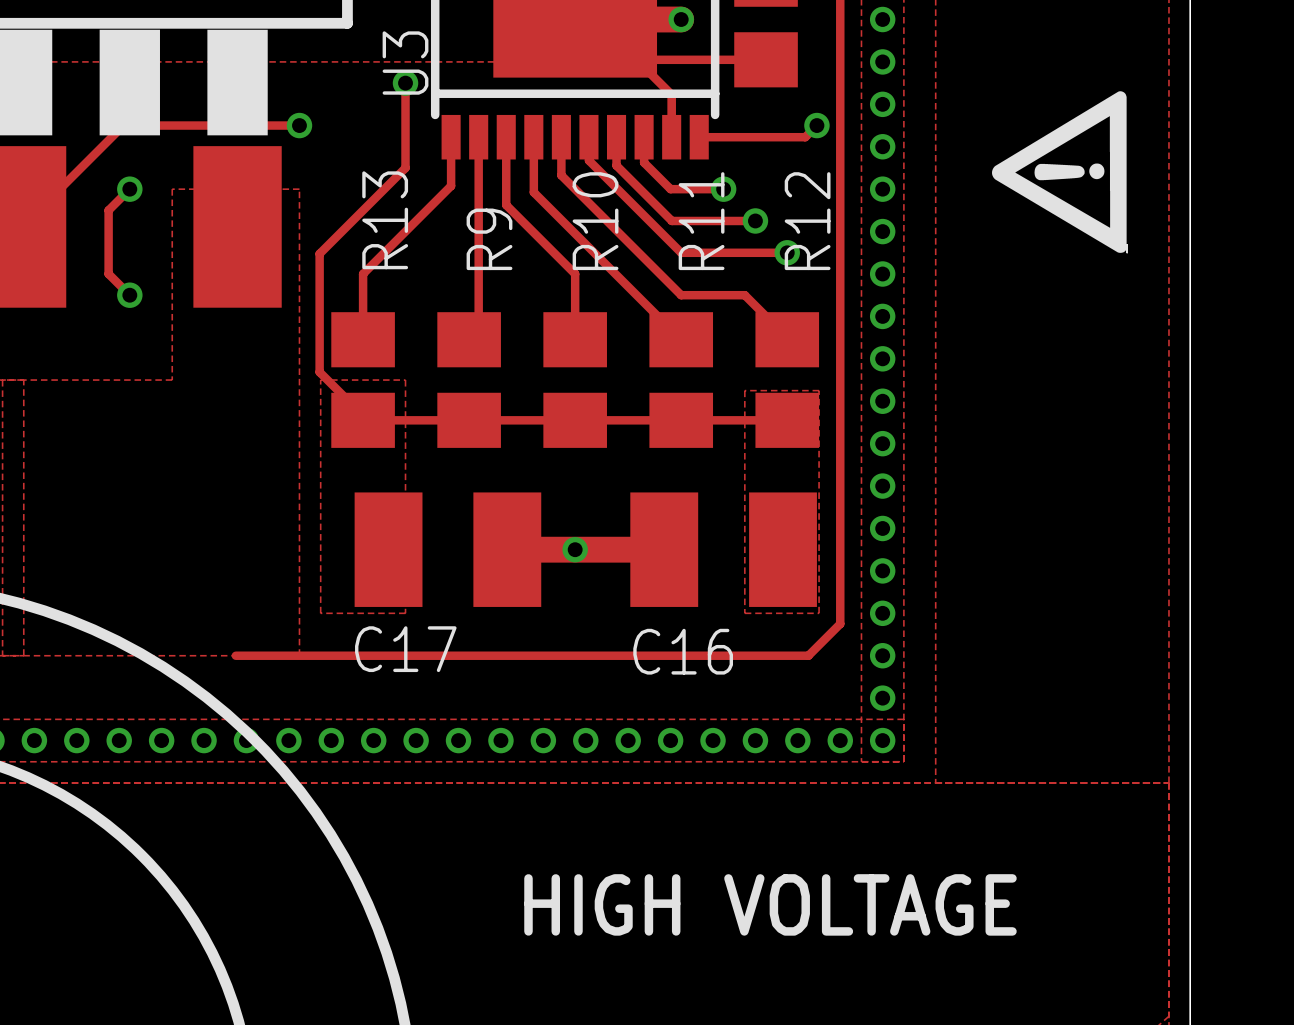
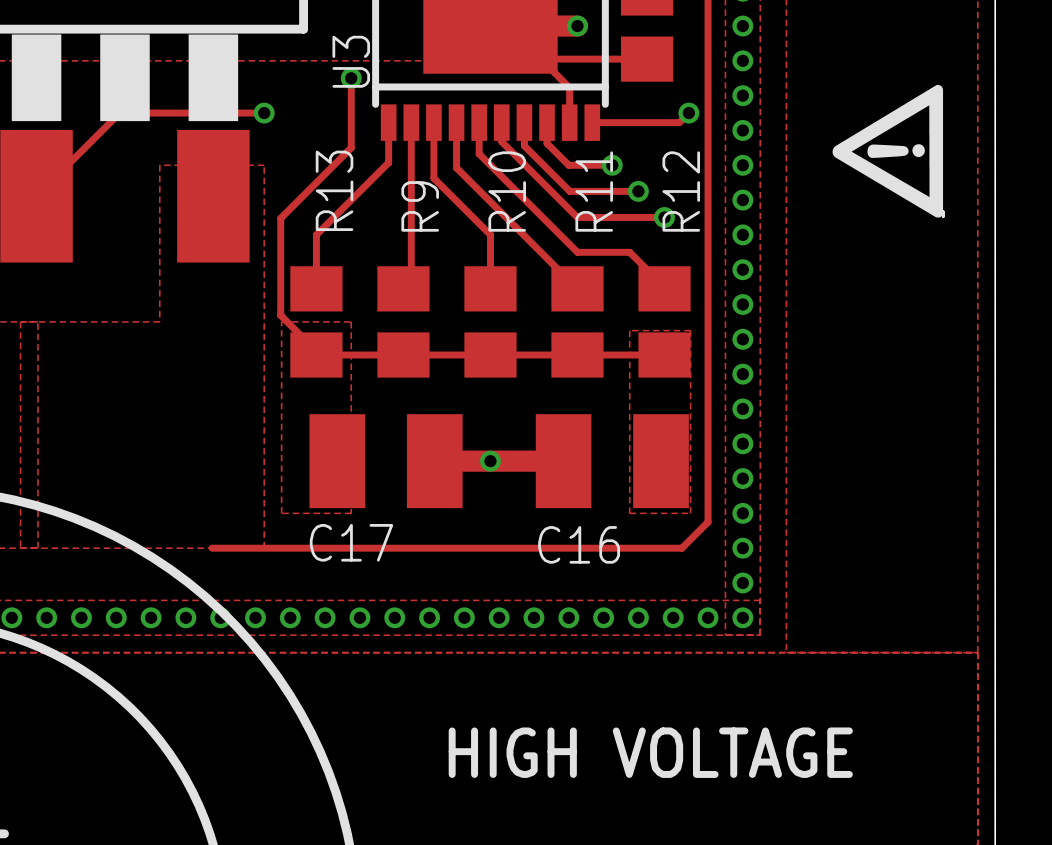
track: (129, 189) (108, 210) (108, 274) (129, 295) -> none
via: (129, 189) -> none
via: (129, 295) -> none

